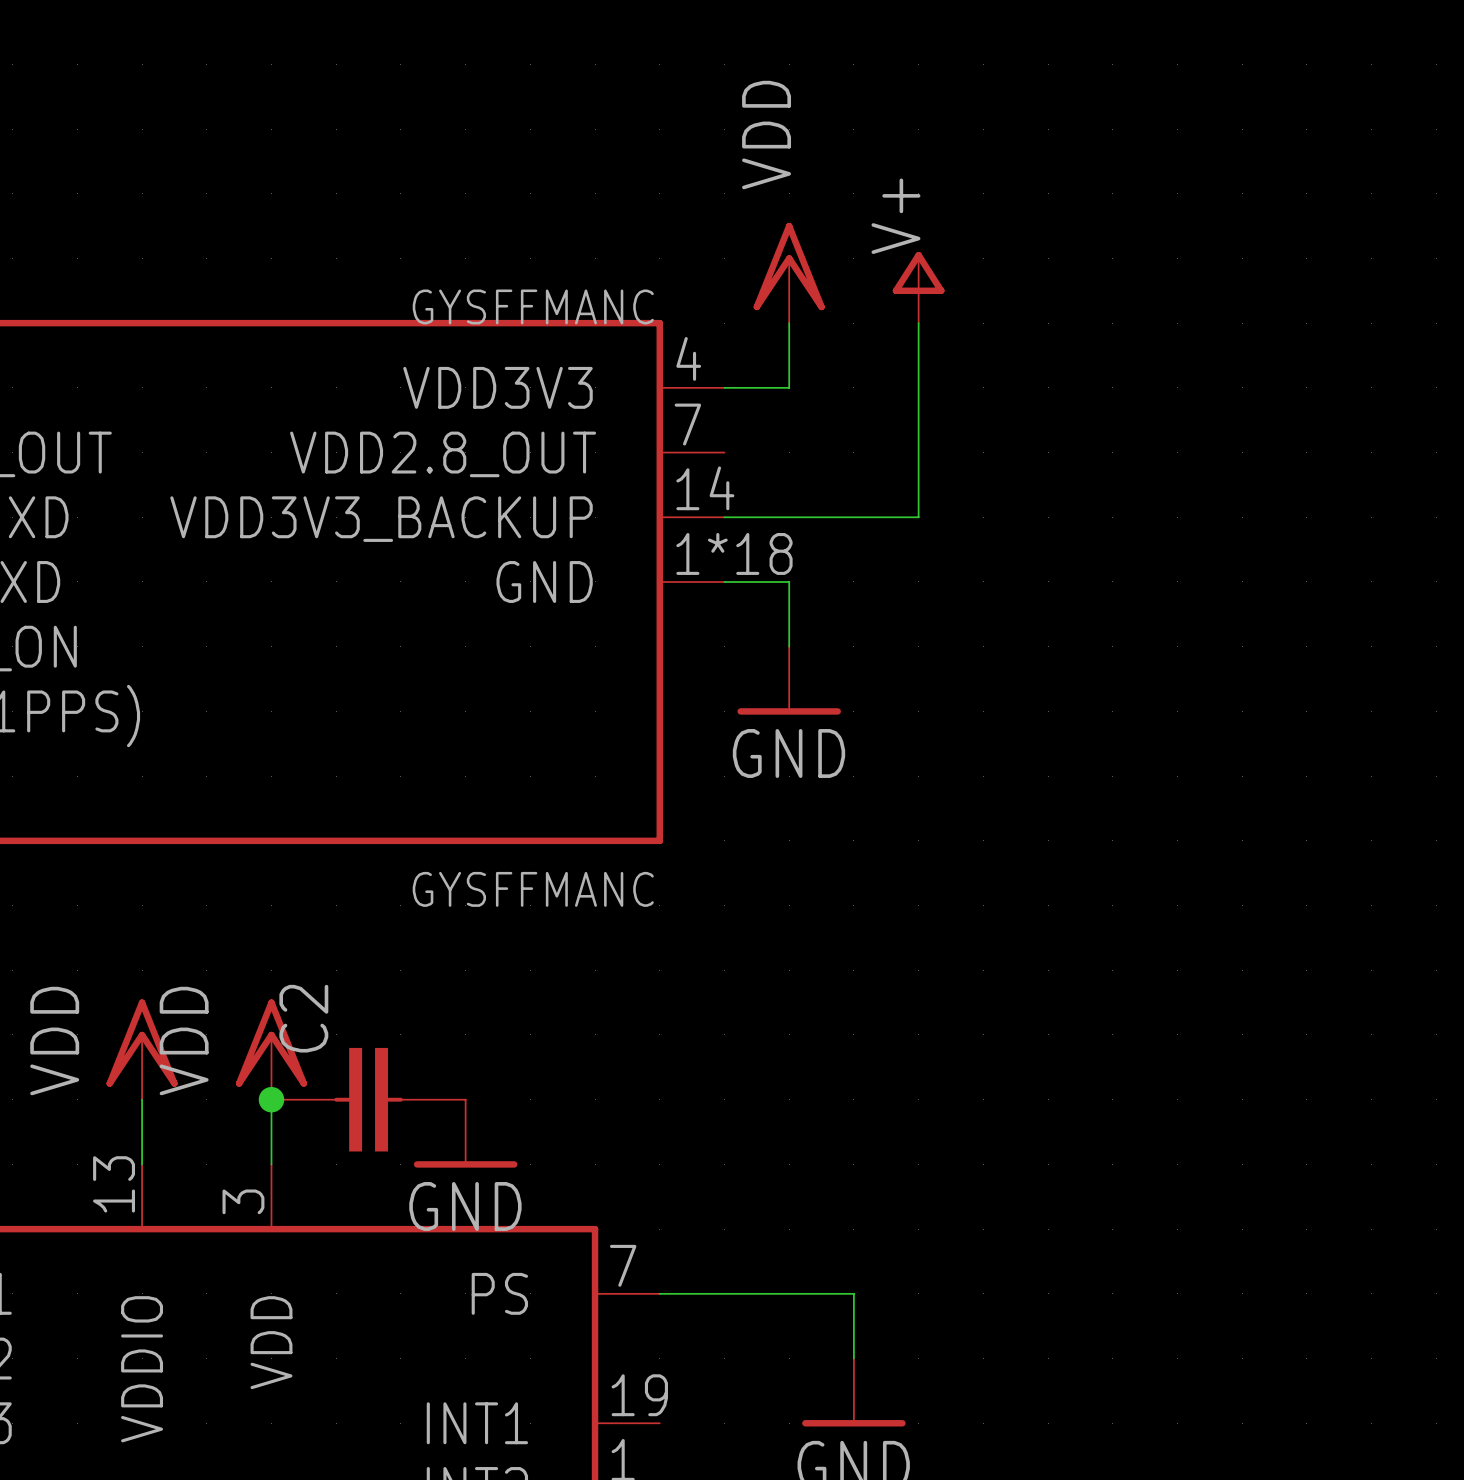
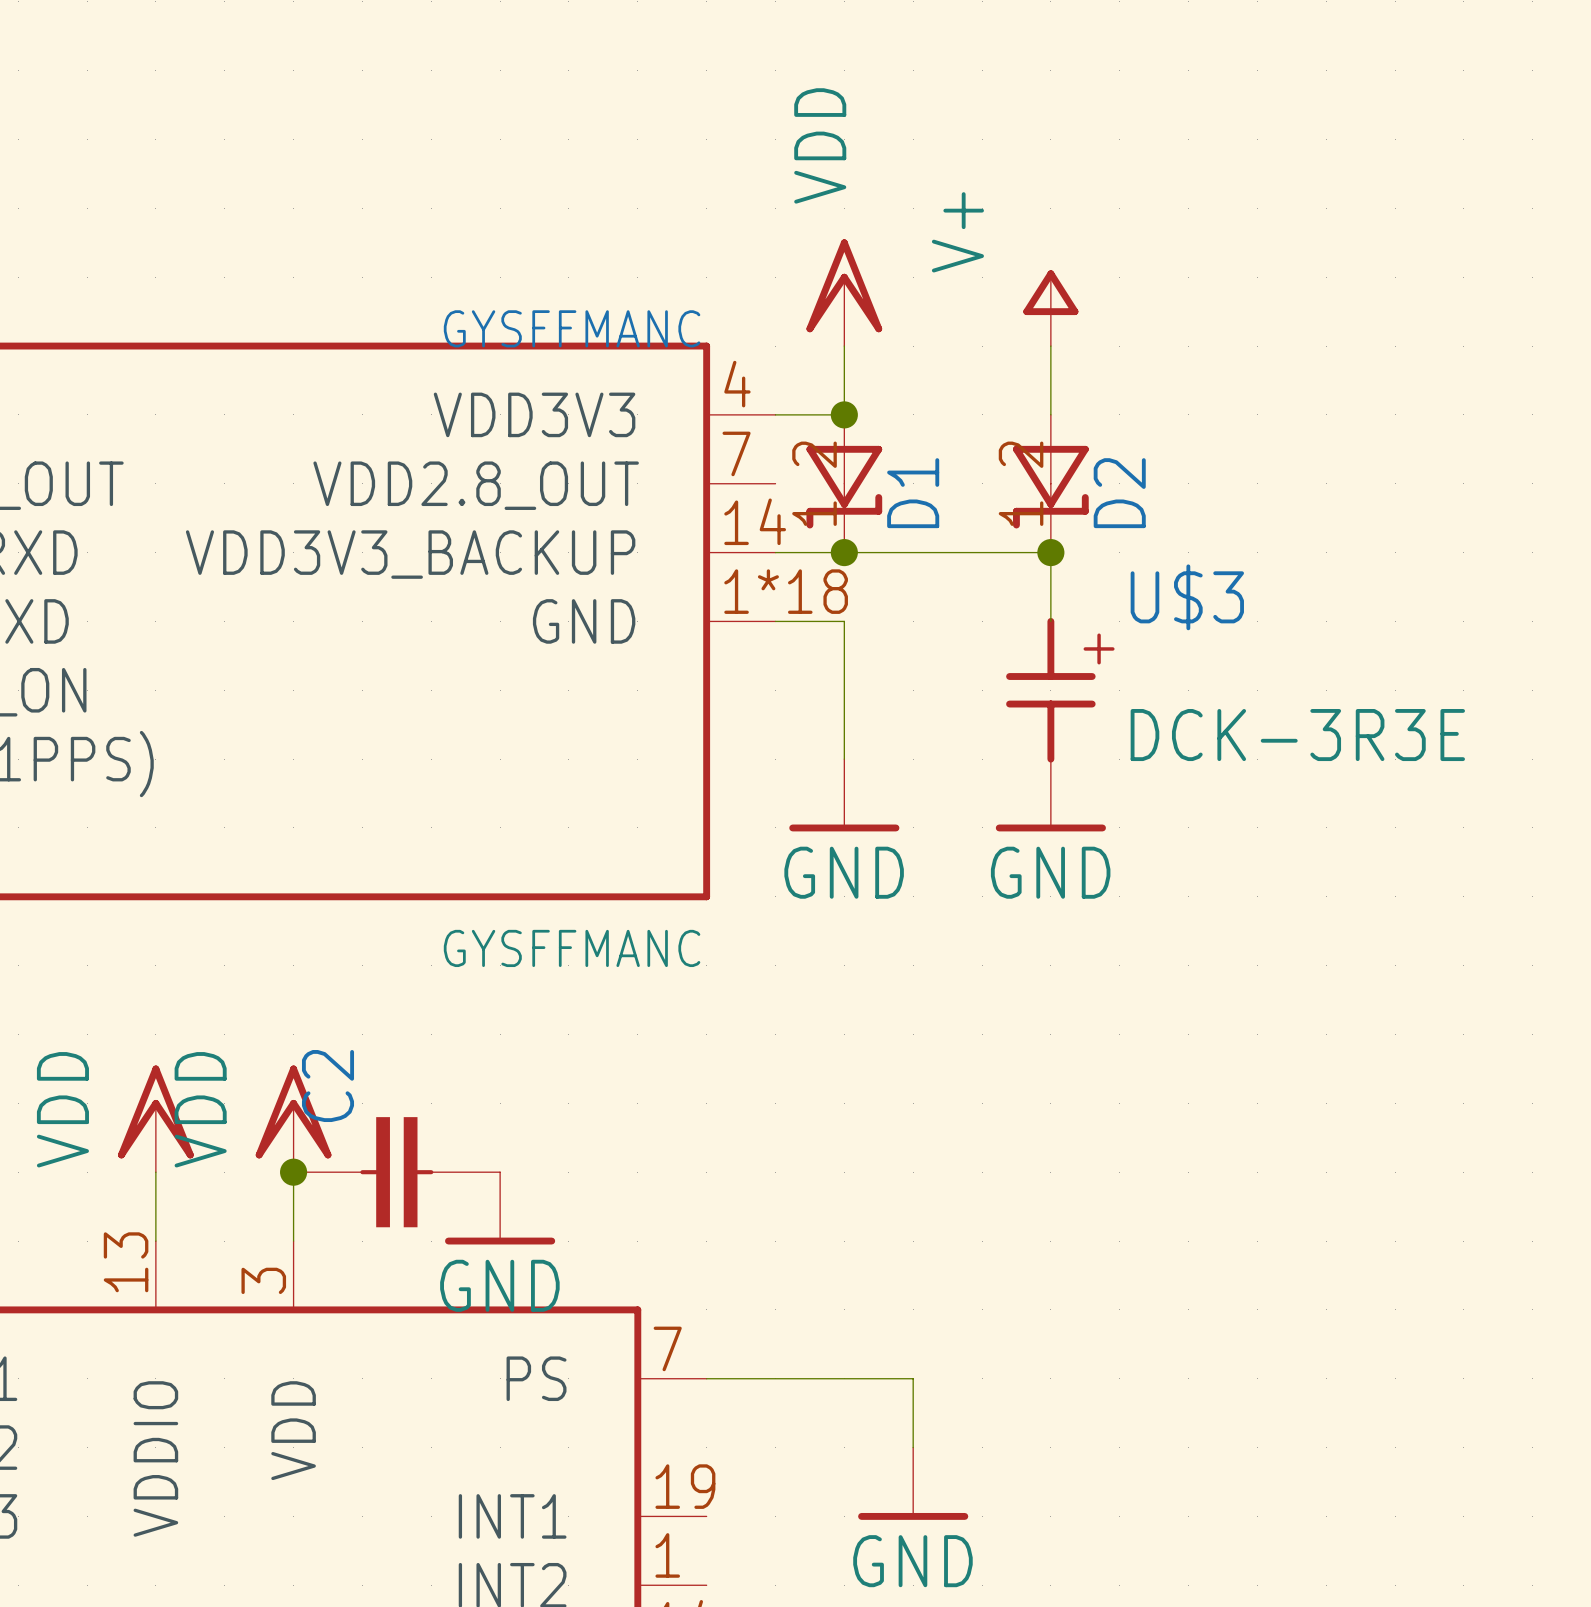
power symbol position: V+ (918, 287) -> V+ (1050, 308)
wire: (918, 323) (918, 517) -> (1050, 621) (1050, 552) (982, 552)
wire: none -> (1050, 346) (1050, 414)
junction: none -> (844, 414)
D1: none -> (844, 483)
D2: none -> (1050, 483)
junction: none -> (844, 552)
junction: none -> (1050, 552)
U$3: none -> DCK-3R3E (1060, 690)
power symbol position: GND (789, 680) -> GND (844, 795)
power symbol: none -> GND (1050, 795)

